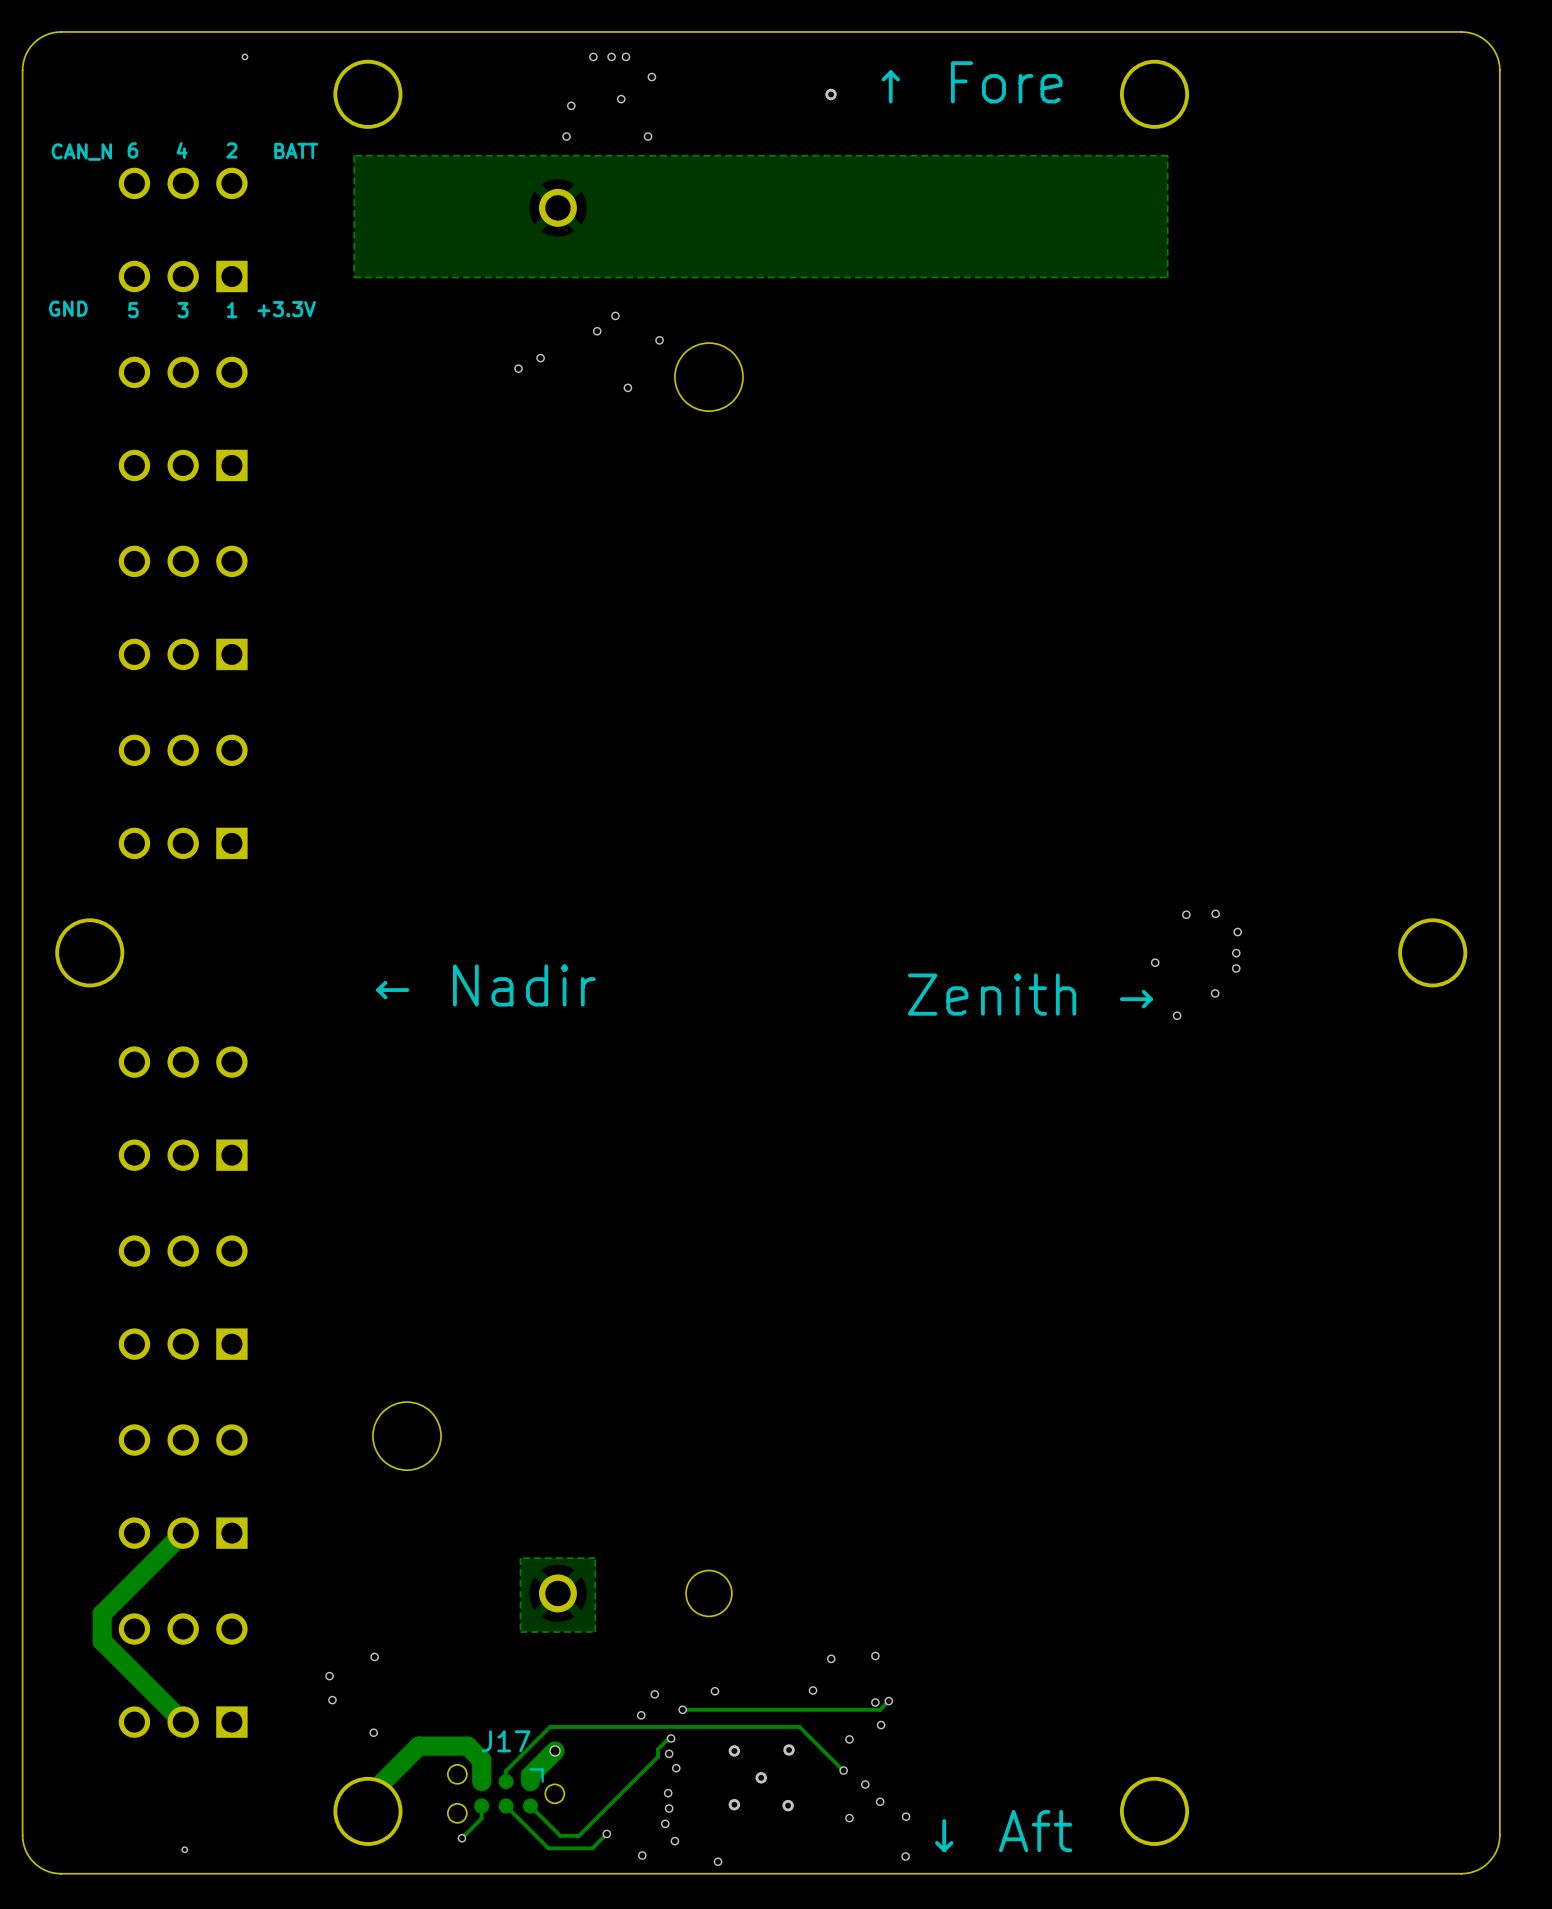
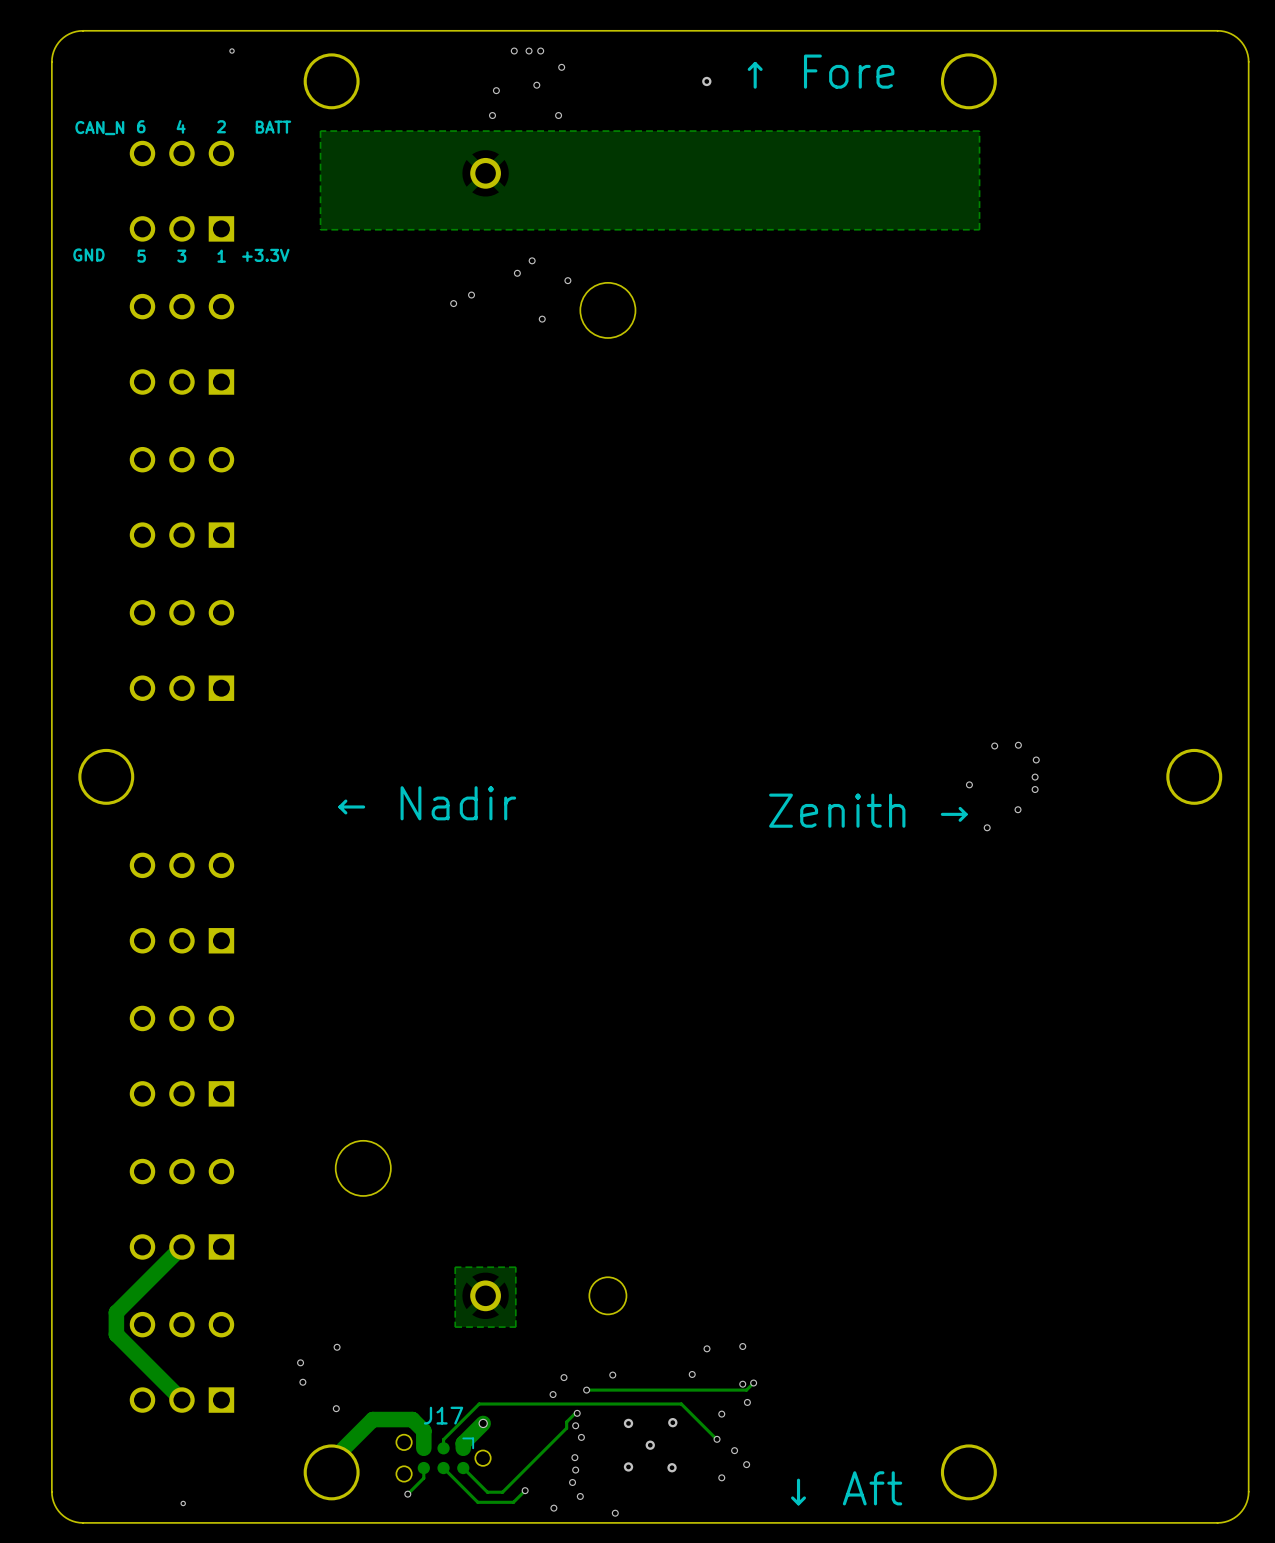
via: (906, 1816) -> none
via: (905, 1856) -> none

